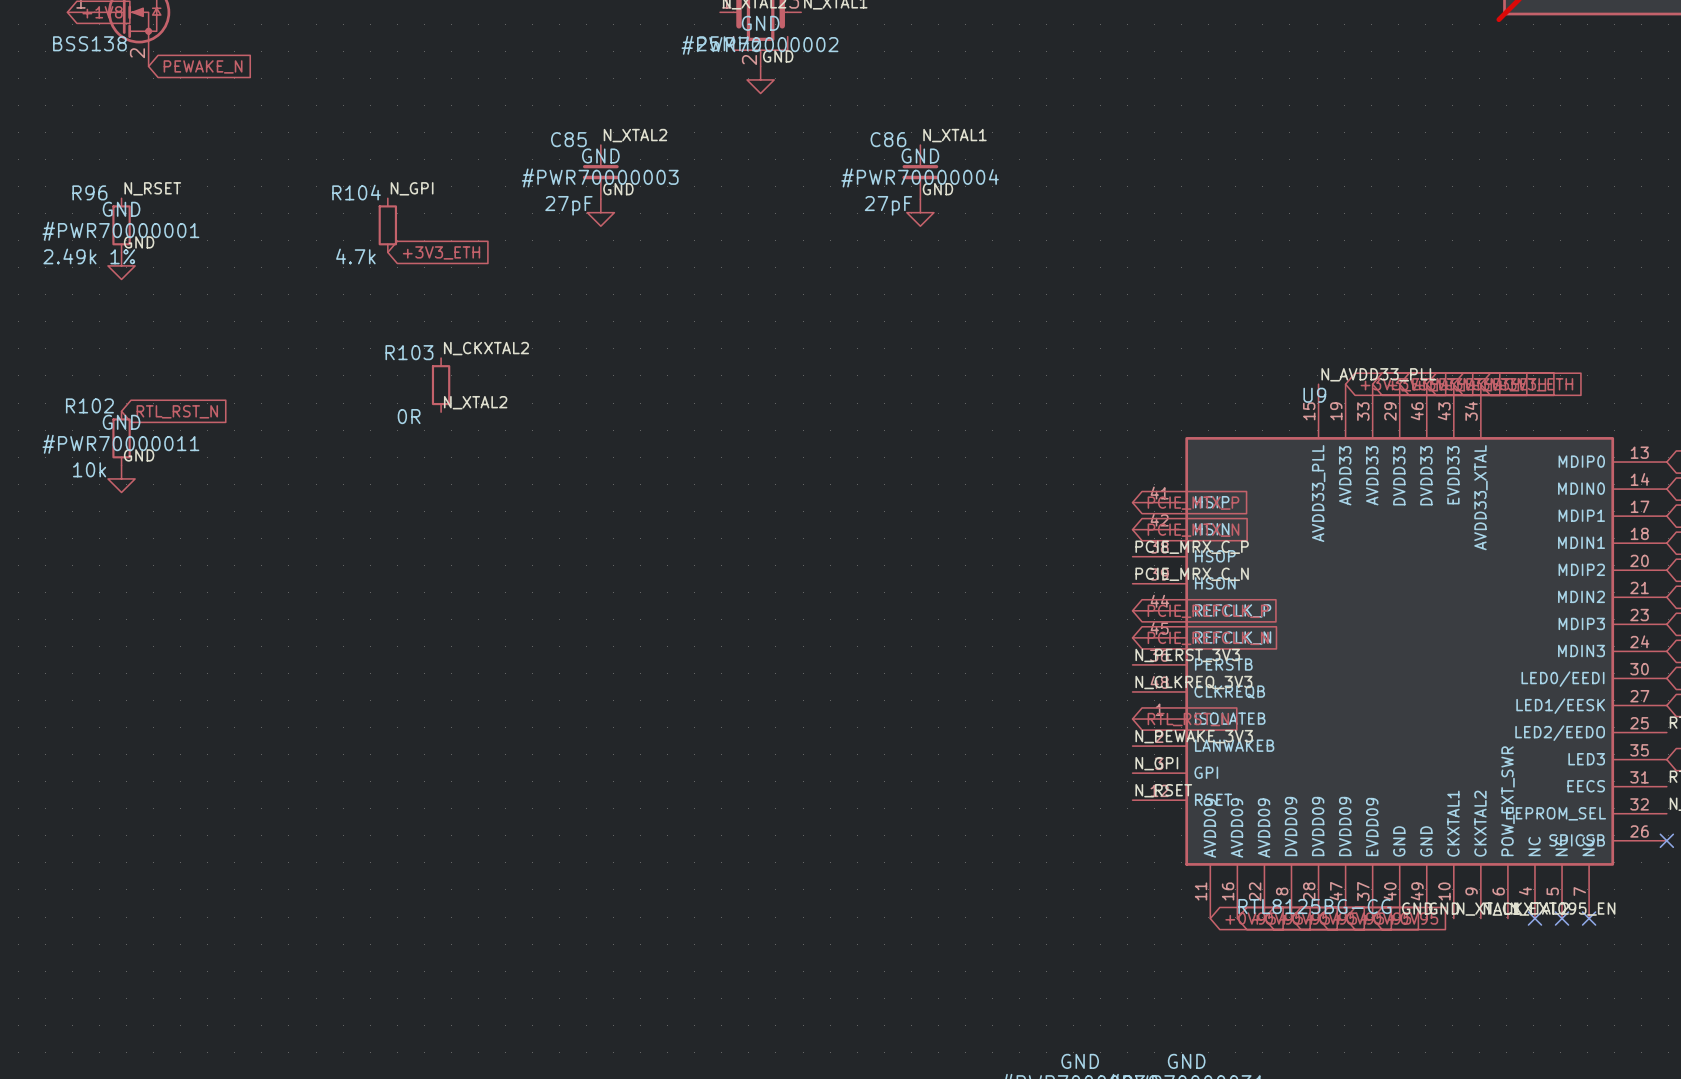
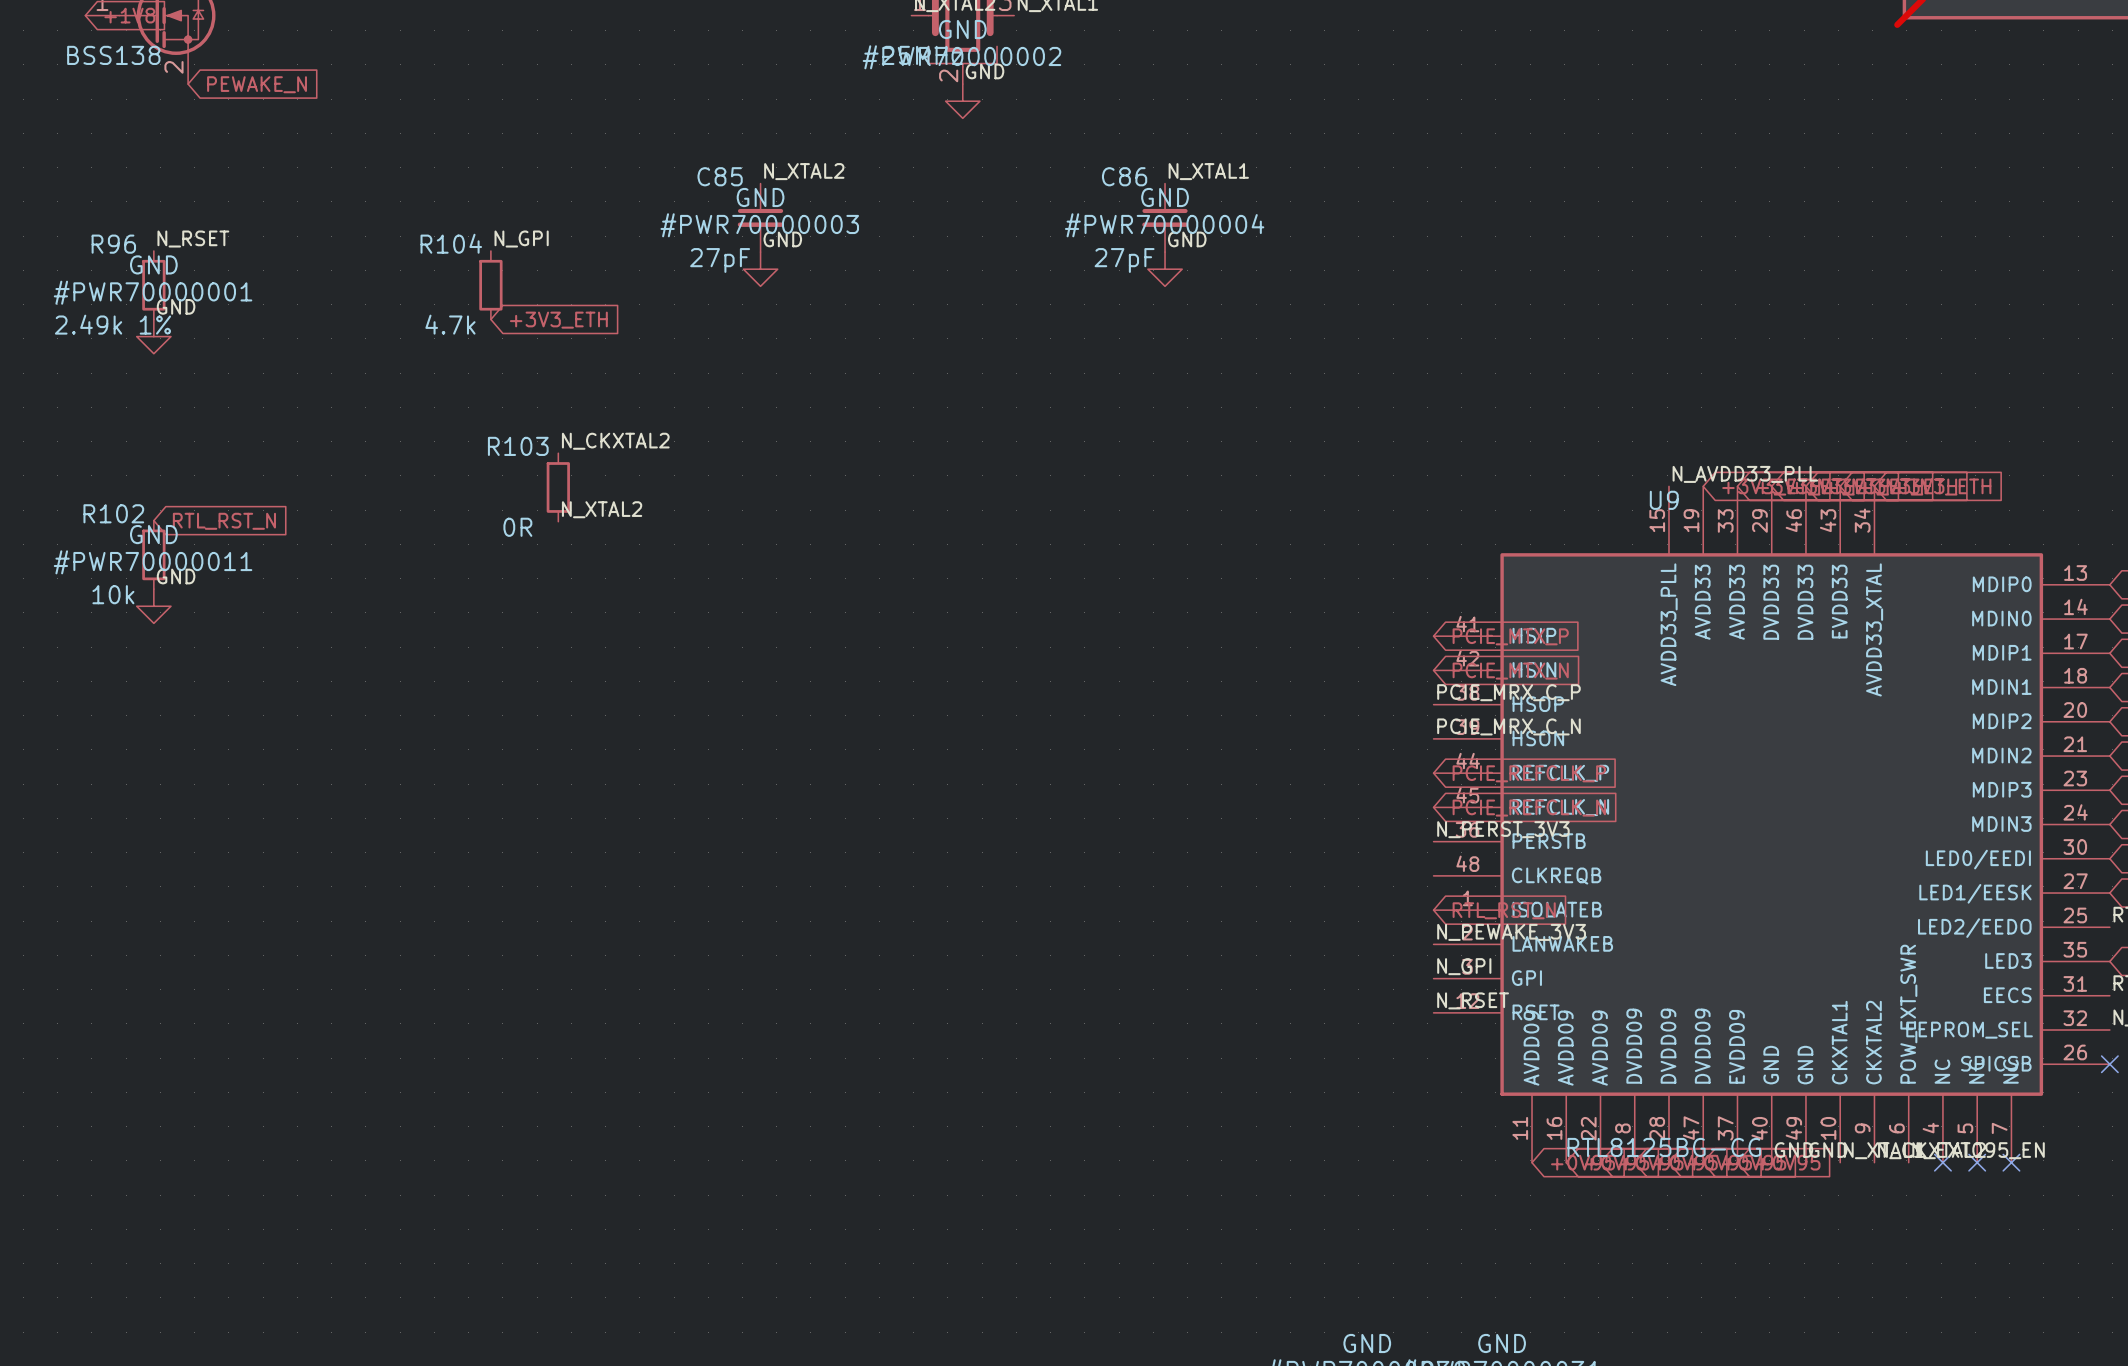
label: N_CLKREQ_3V3 (1193, 682) -> none

